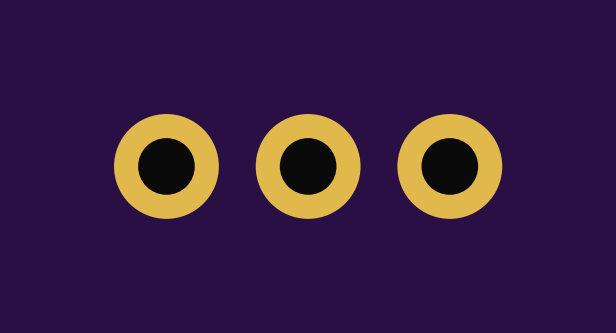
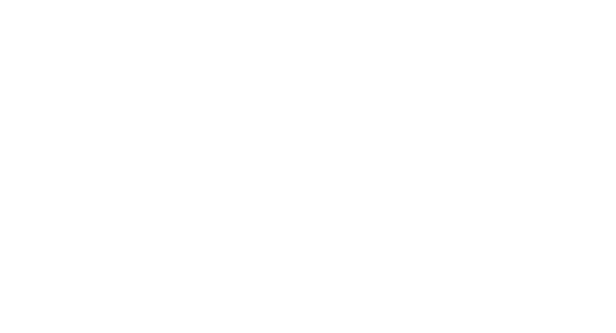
part: (308, 166) -> none

